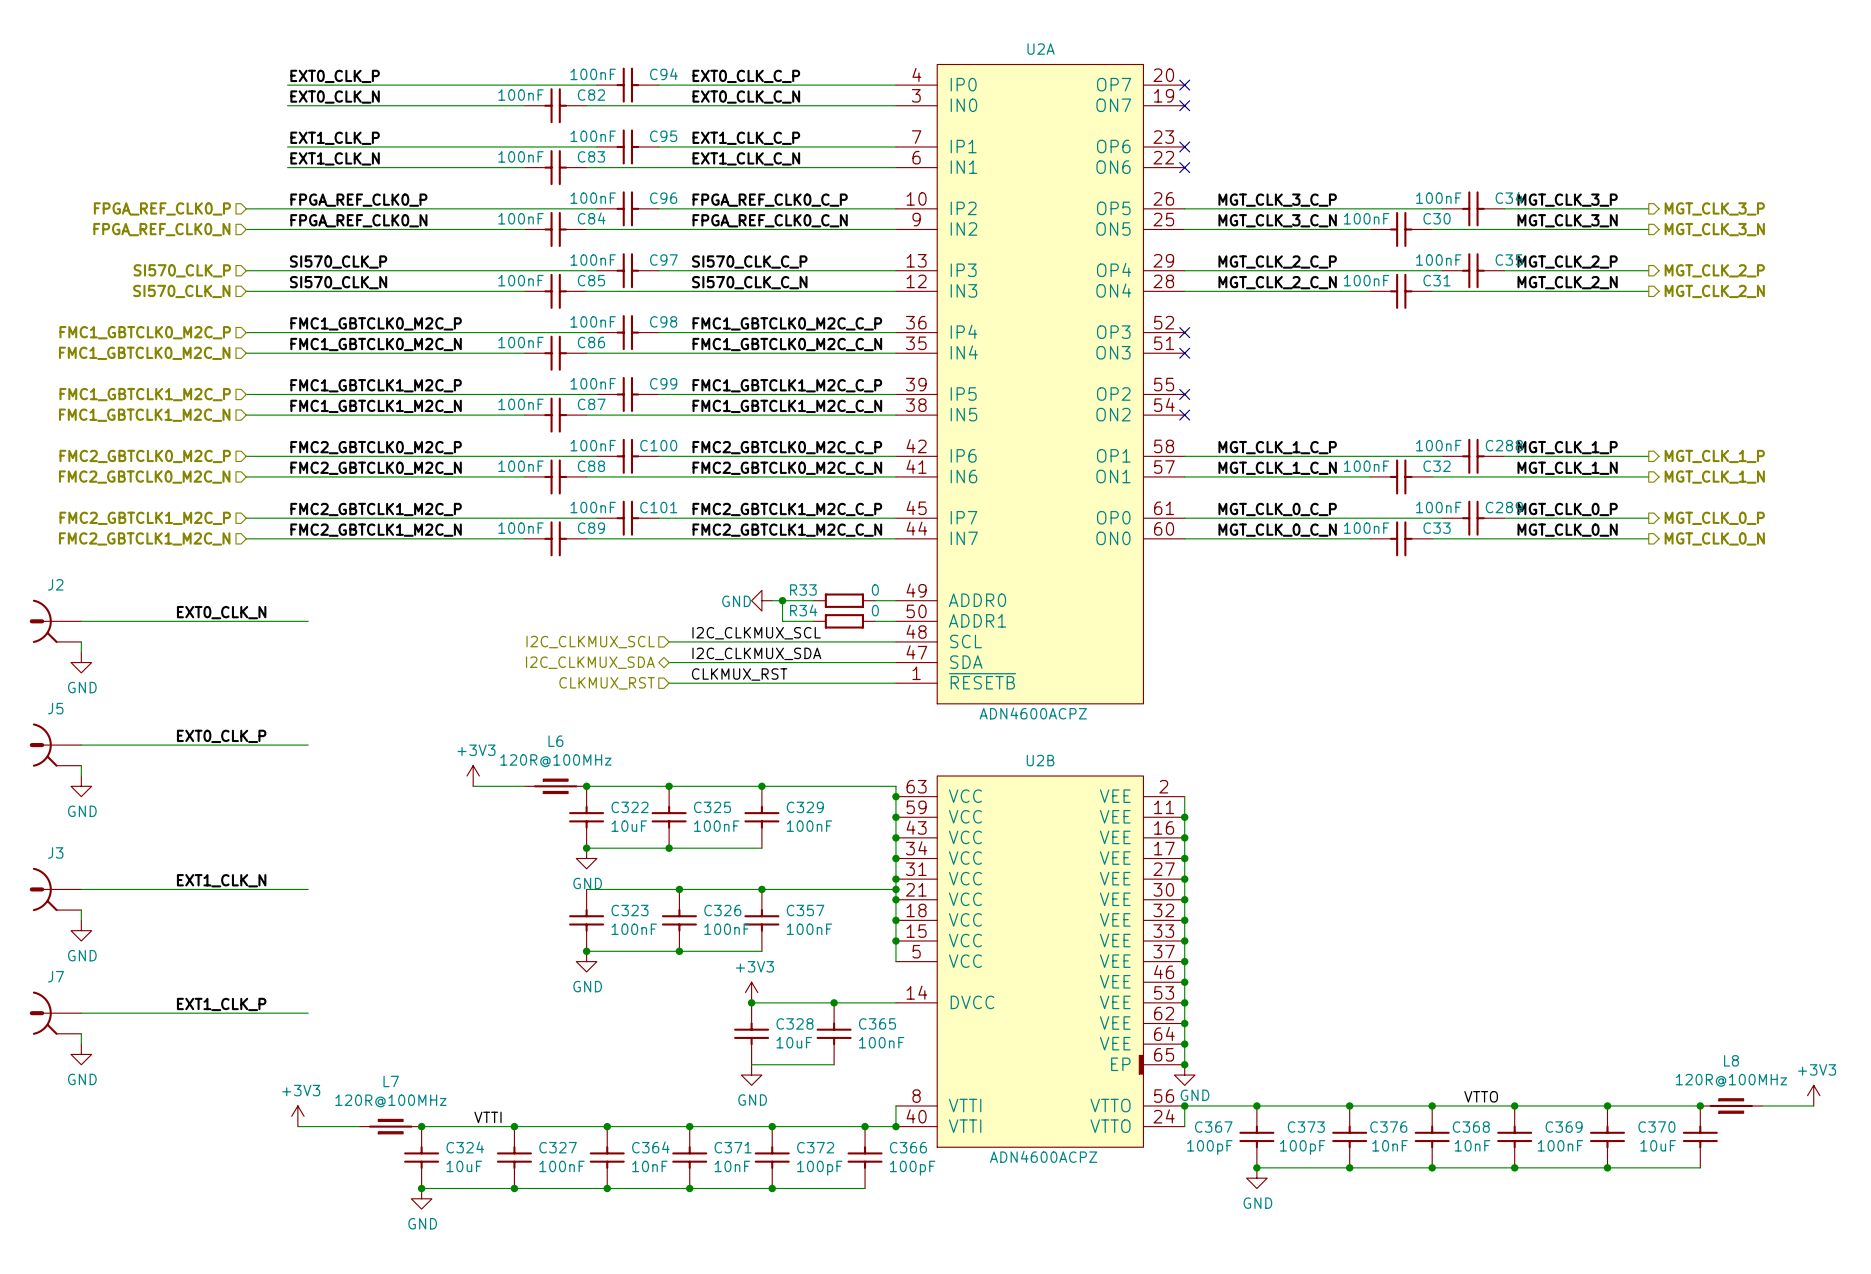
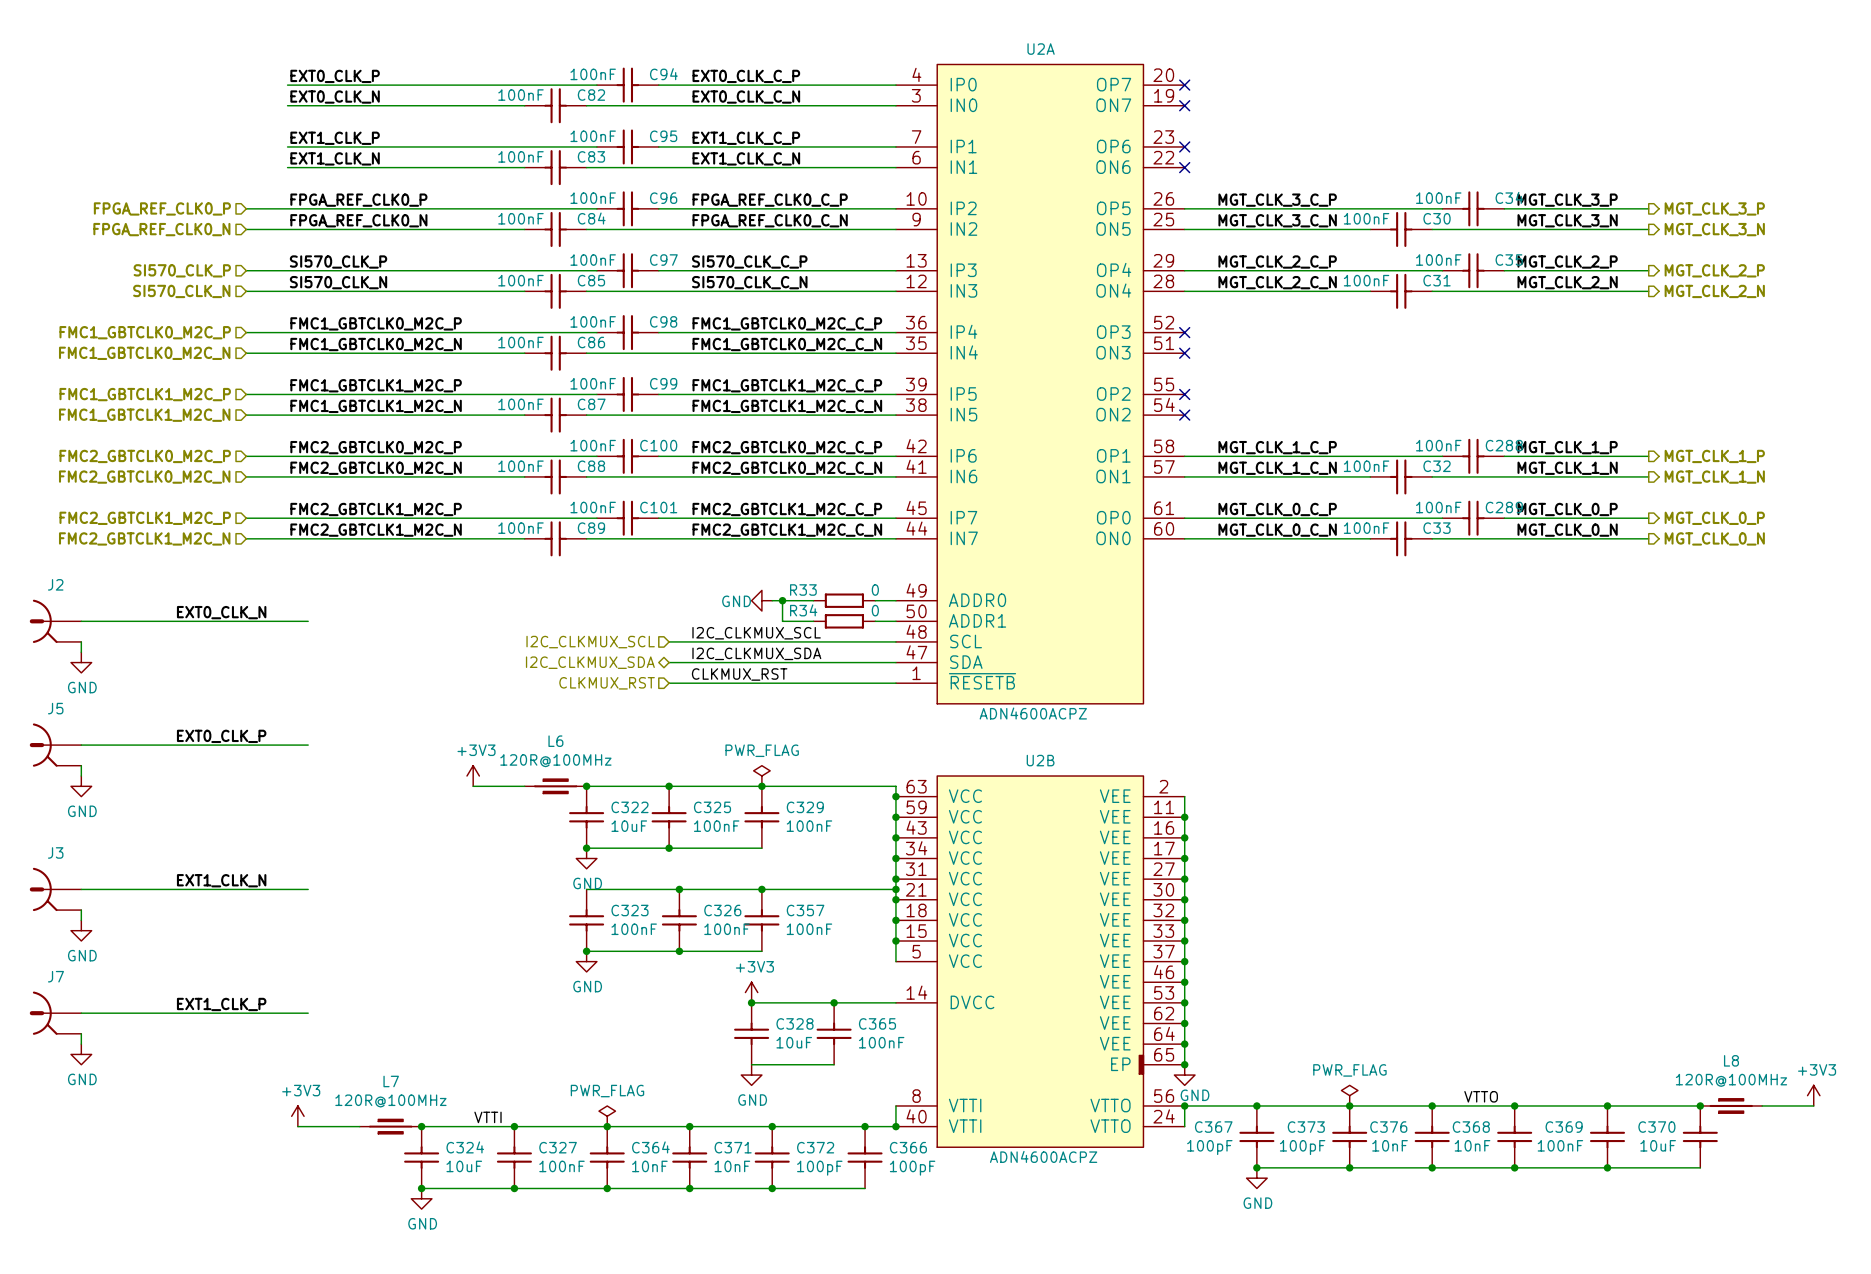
power symbol: none -> PWR_FLAG (761, 776)
power symbol: none -> PWR_FLAG (1349, 1095)
power symbol: none -> PWR_FLAG (607, 1116)

